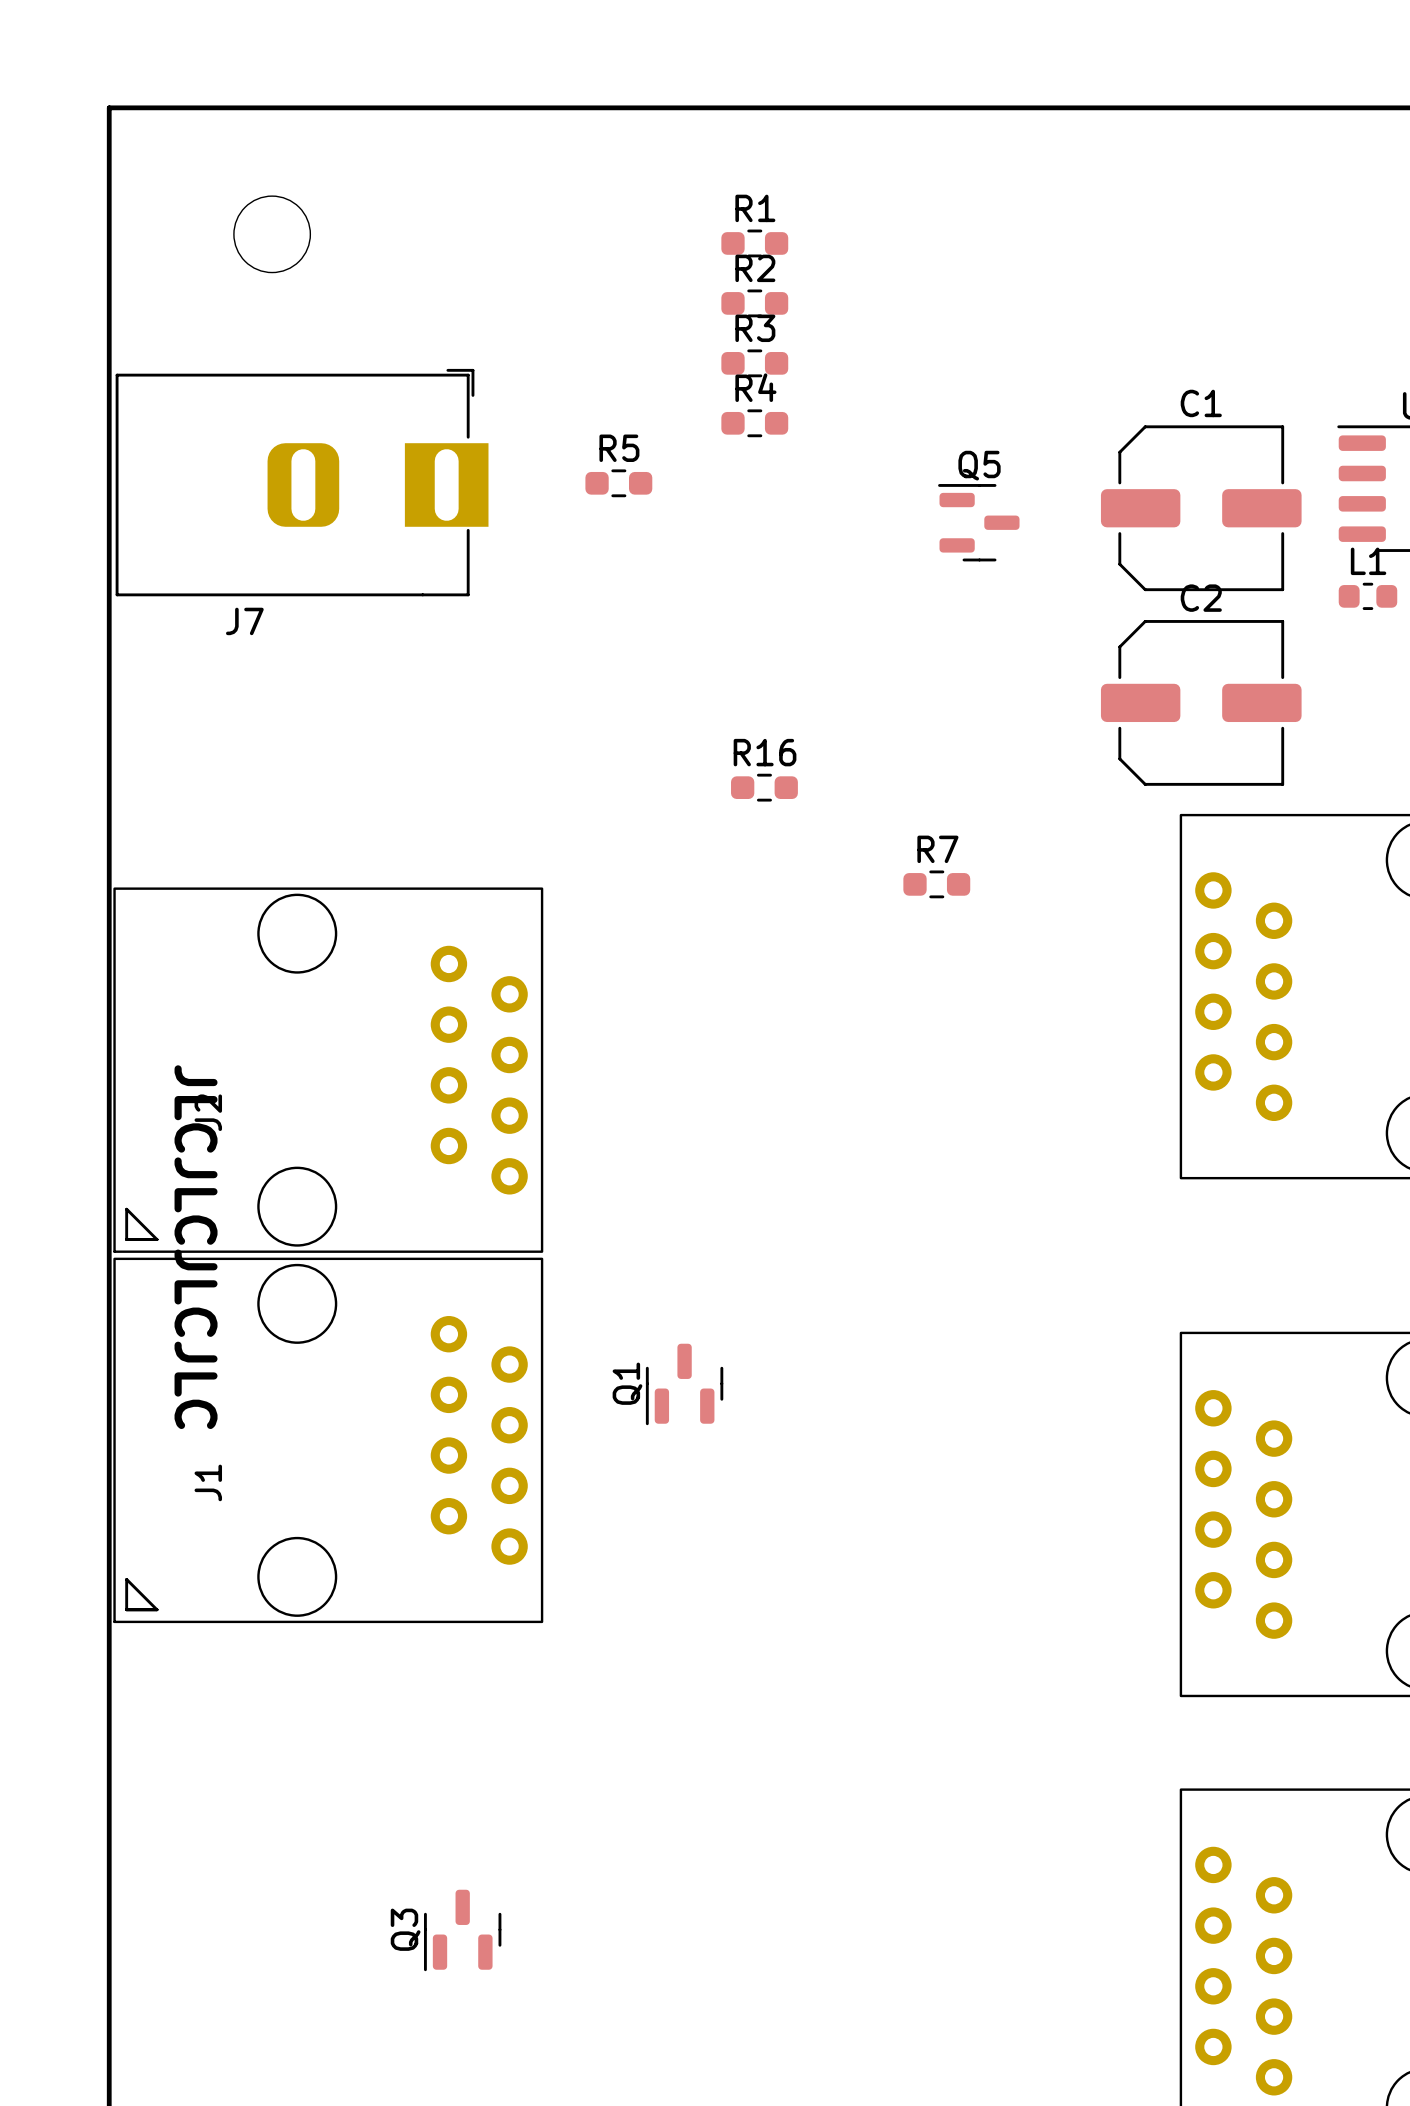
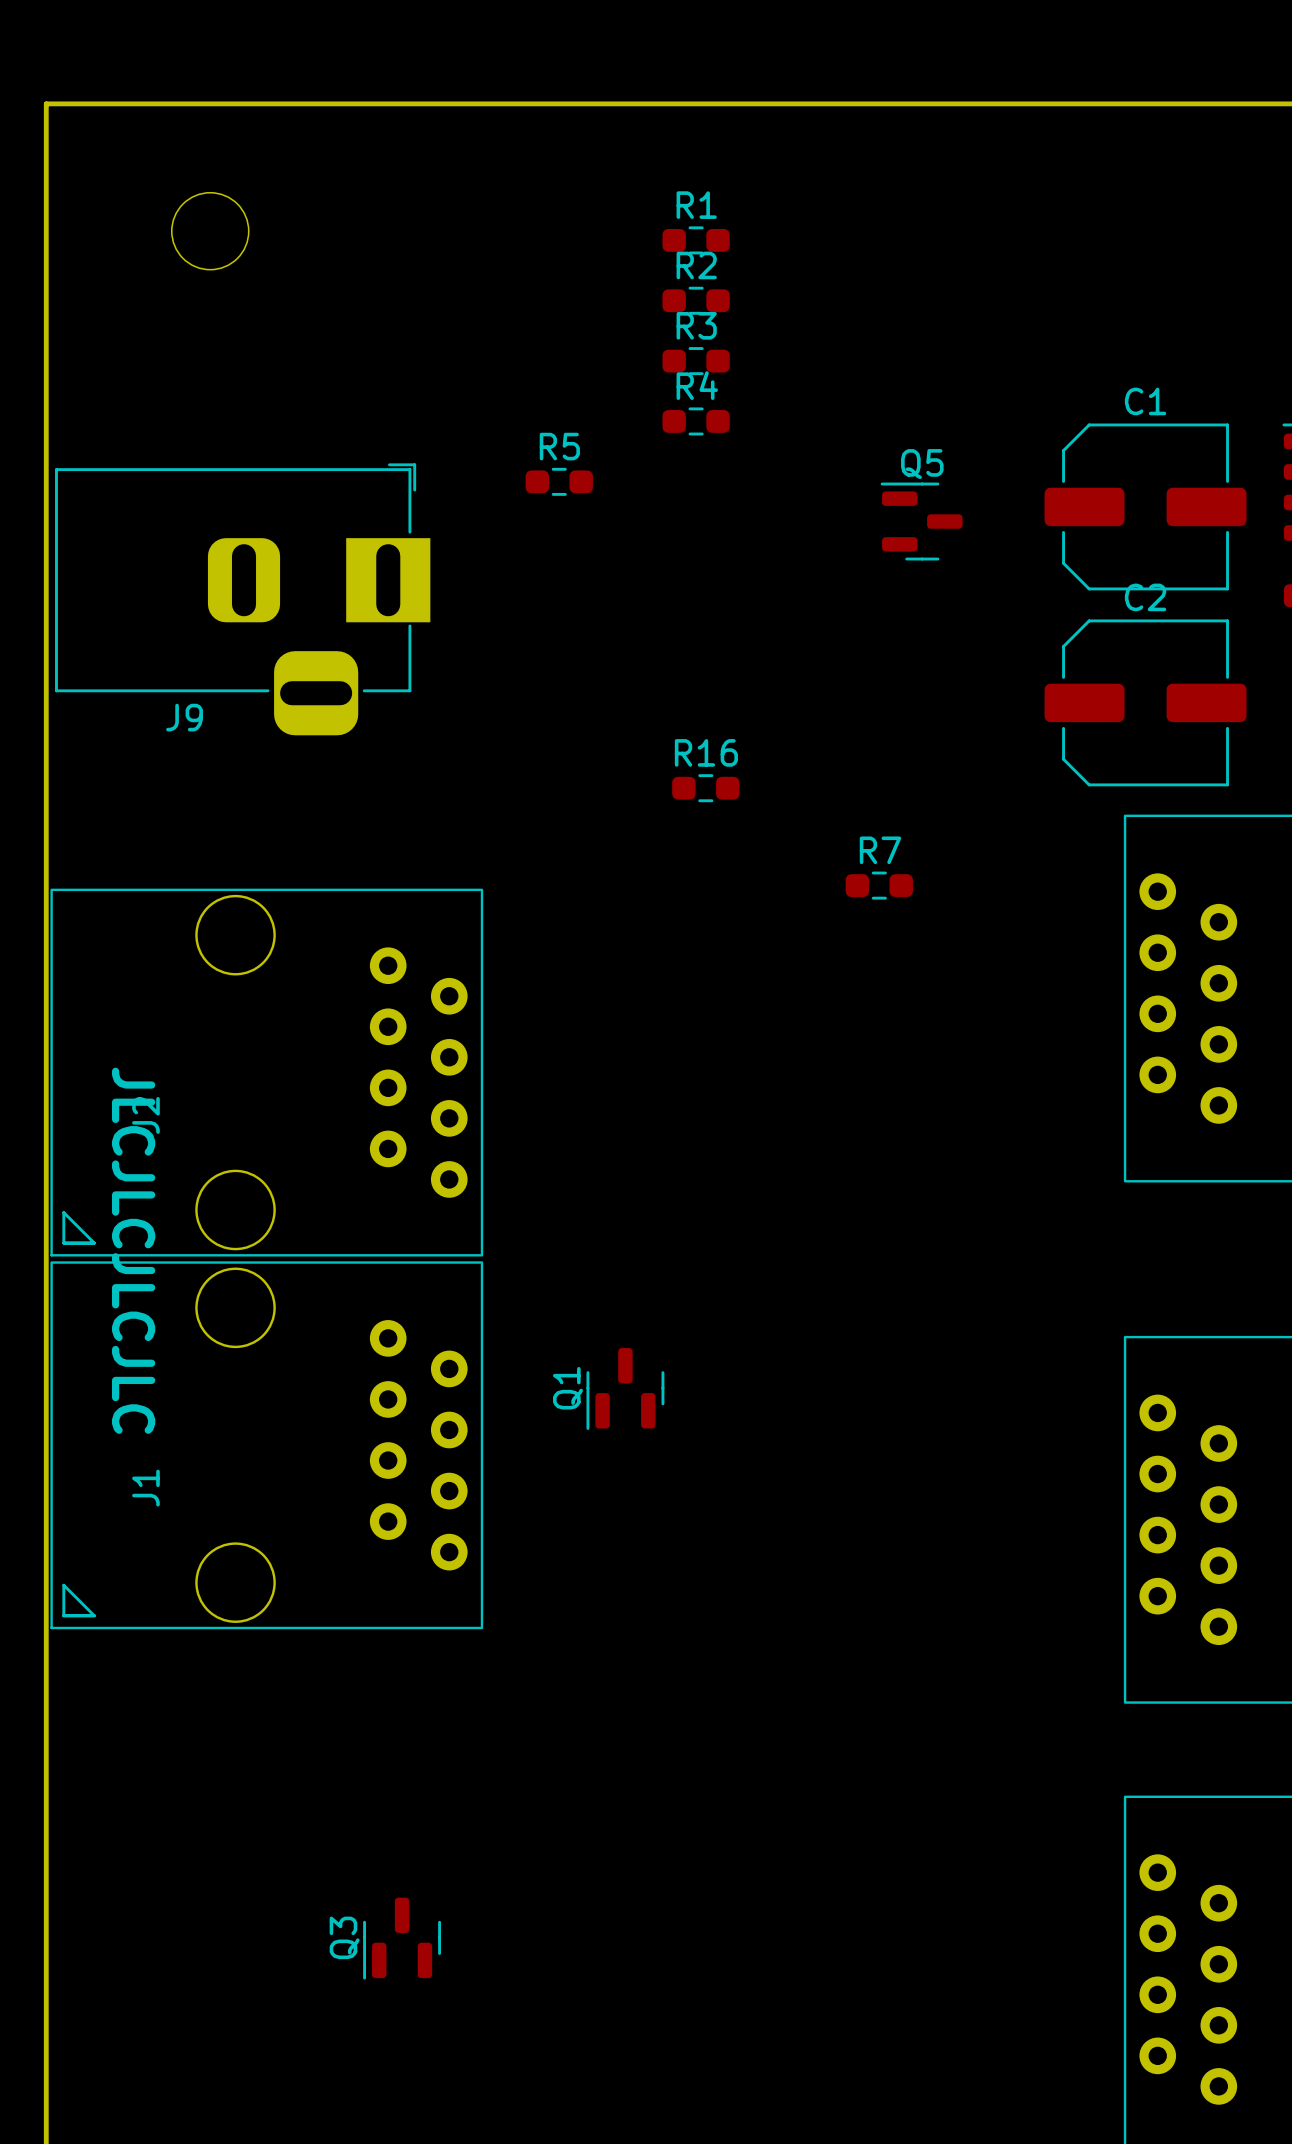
J7: (302, 482) -> none
J9: none -> (242, 599)

